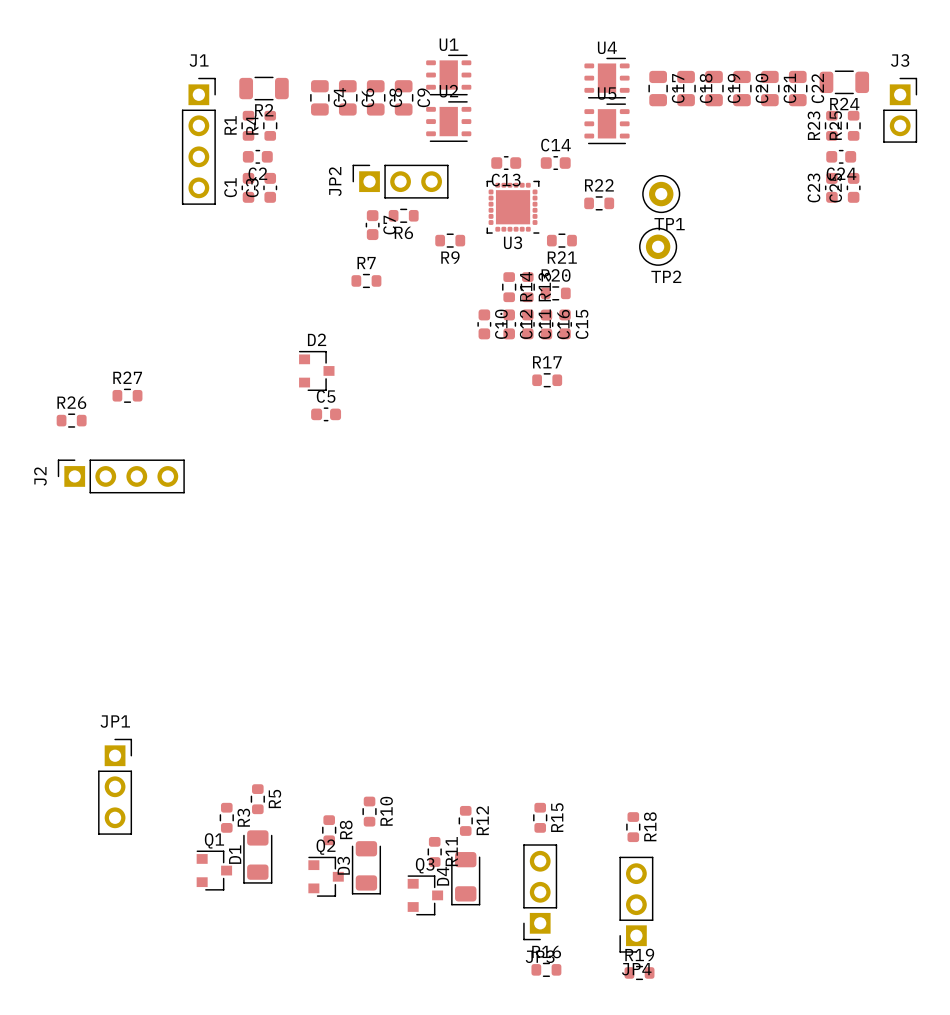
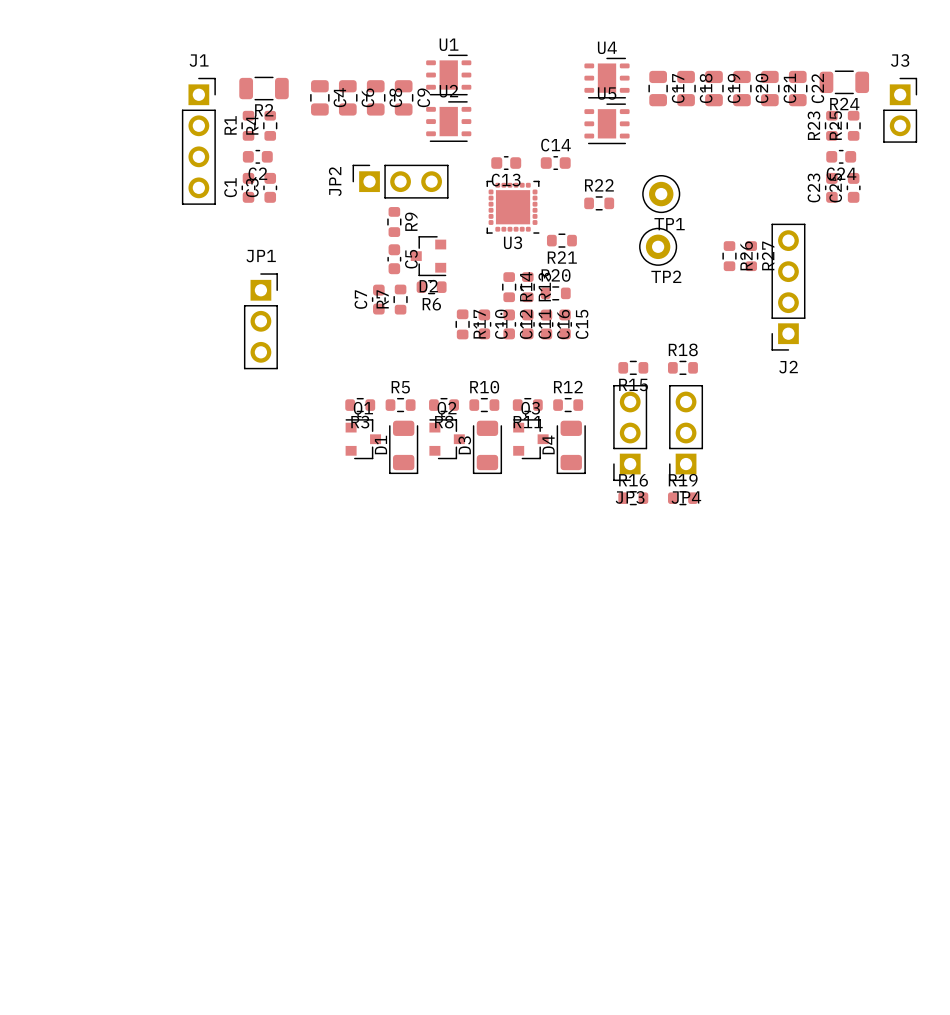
R6 position: (403, 215) -> (431, 287)
C7 position: (372, 225) -> (378, 299)
C7 name position: C7 (389, 225) -> C7 (360, 299)
R9 rotation: 0° (450, 240) -> 90° clockwise (394, 221)
R9 position: (450, 240) -> (394, 221)
R9 name position: R9 (450, 257) -> R9 (411, 221)
R7 name position: R7 (366, 263) -> R7 (382, 299)
R7 rotation: 0° (366, 280) -> 90° clockwise (400, 299)
R7 position: (366, 280) -> (400, 299)
D2 rotation: 0° (316, 370) -> 180° (428, 256)
D2 position: (316, 370) -> (428, 256)
R17 rotation: 0° (547, 380) -> 90° clockwise (462, 324)
R17 position: (547, 380) -> (462, 324)
R27 rotation: 0° (127, 395) -> 90° clockwise (751, 256)
R27 position: (127, 395) -> (751, 256)
C5 rotation: 0° (326, 414) -> 90° clockwise (394, 259)
C5 position: (326, 414) -> (394, 259)
R26 rotation: 0° (71, 420) -> 90° clockwise (729, 256)
R26 position: (71, 420) -> (729, 256)
J2 rotation: 0° (121, 476) -> 90° counterclockwise (788, 287)
J2 position: (121, 476) -> (788, 287)
JP1 position: (115, 786) -> (260, 321)
R5 name position: R5 (274, 798) -> R5 (400, 387)
R5 rotation: 0° (257, 799) -> 90° clockwise (400, 405)
R5 position: (257, 799) -> (400, 405)
R10 rotation: 0° (369, 811) -> 90° clockwise (484, 405)
R10 position: (369, 811) -> (484, 405)
R10 name position: R10 (386, 811) -> R10 (484, 387)
R3 rotation: 0° (226, 817) -> 90° clockwise (360, 405)
R3 position: (226, 817) -> (360, 405)
R15 rotation: 0° (540, 817) -> 90° clockwise (633, 367)
R15 position: (540, 817) -> (633, 367)
R12 rotation: 0° (465, 820) -> 90° clockwise (568, 405)
R12 position: (465, 820) -> (568, 405)
R12 name position: R12 (482, 820) -> R12 (568, 387)
R18 name position: R18 (650, 826) -> R18 (683, 349)
R18 rotation: 0° (633, 827) -> 90° clockwise (682, 367)
R18 position: (633, 827) -> (682, 367)
R8 rotation: 0° (329, 830) -> 90° clockwise (444, 405)
R8 position: (329, 830) -> (444, 405)
R11 rotation: 0° (434, 851) -> 90° clockwise (527, 405)
R11 position: (434, 851) -> (527, 405)
D1 position: (257, 857) -> (403, 447)
D3 position: (366, 867) -> (487, 447)
Q1 position: (214, 870) -> (363, 439)
Q2 position: (326, 876) -> (447, 439)
D4 position: (465, 878) -> (571, 447)
JP3 position: (540, 892) -> (630, 433)
Q3 position: (425, 895) -> (530, 439)
JP4 position: (636, 904) -> (686, 433)
R16 position: (546, 969) -> (633, 498)
R19 position: (639, 972) -> (682, 498)

